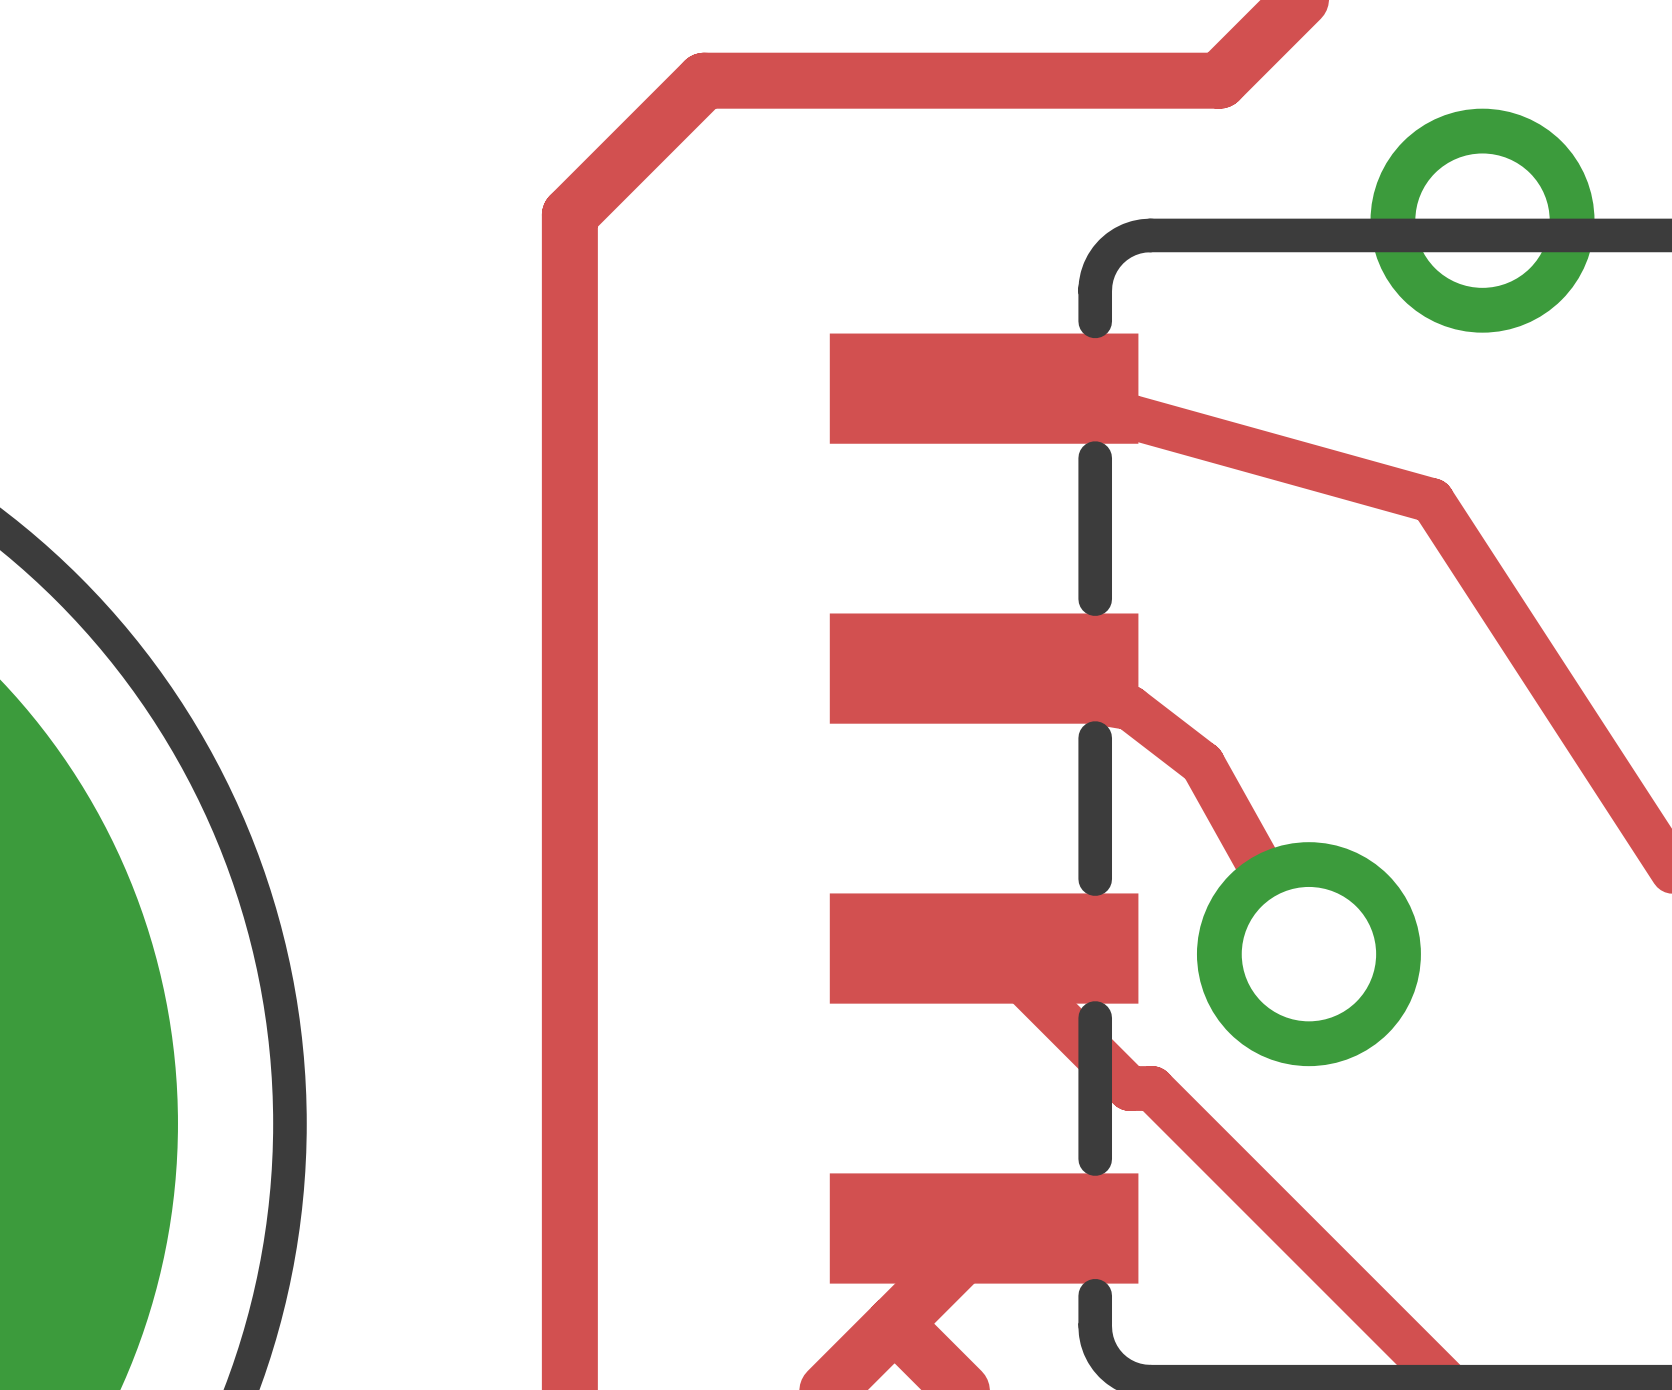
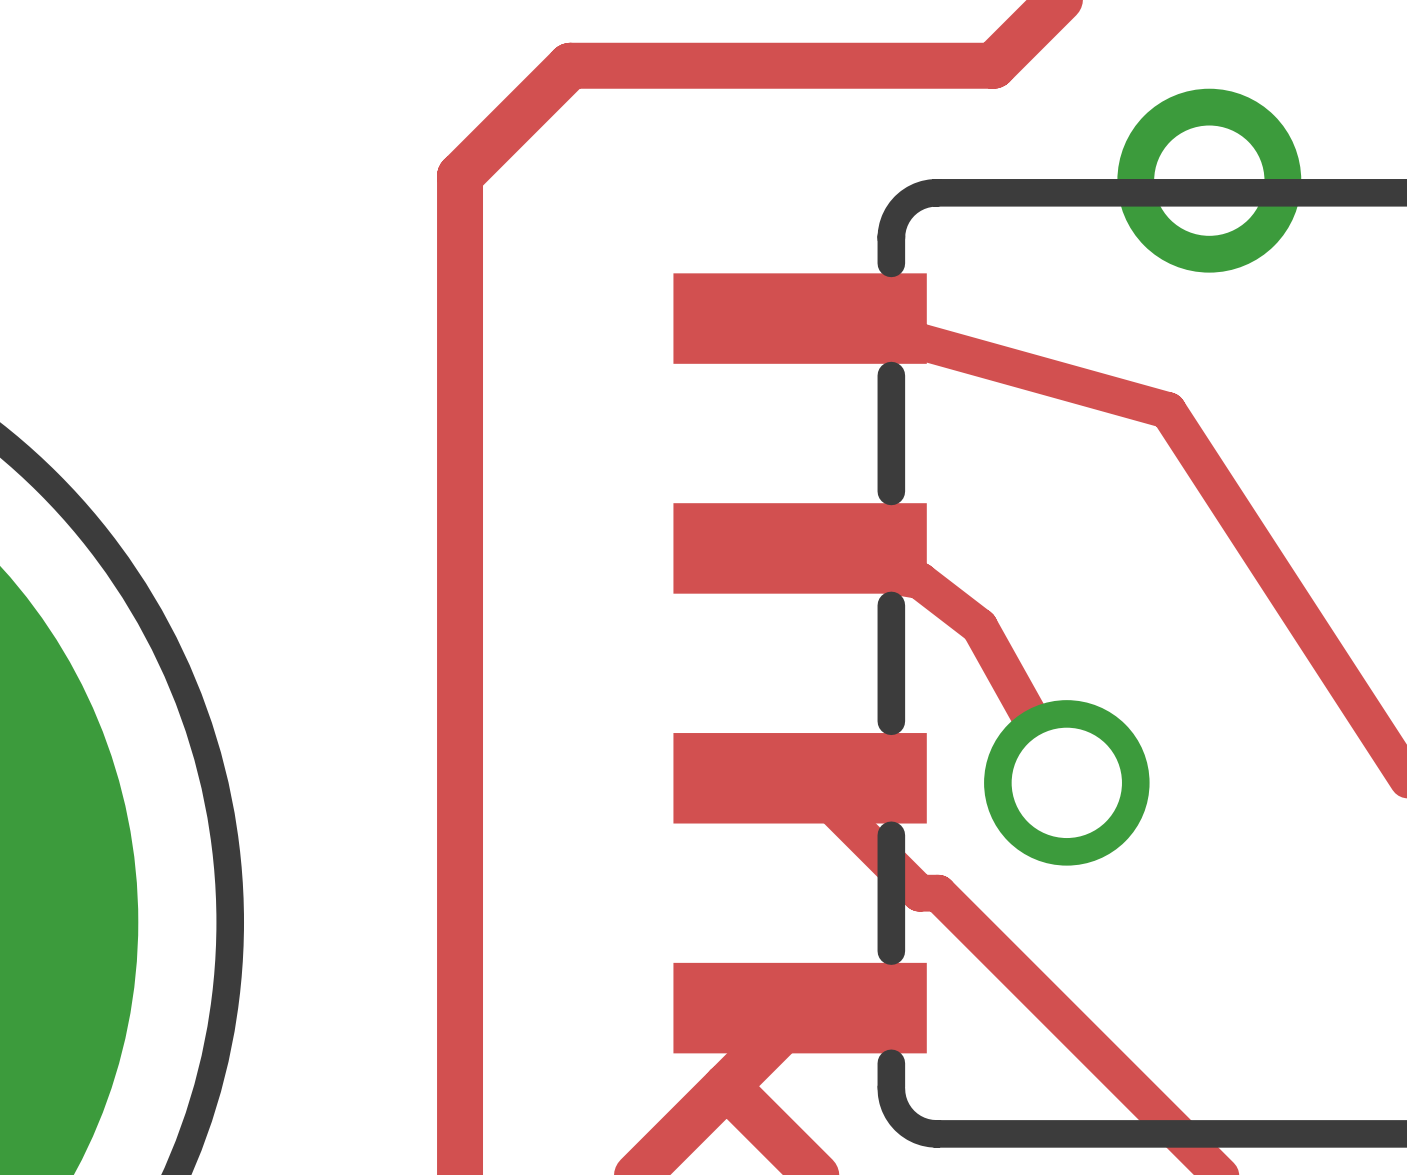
via size: [1196, 842, 1421, 1067] -> [984, 700, 1150, 866]

